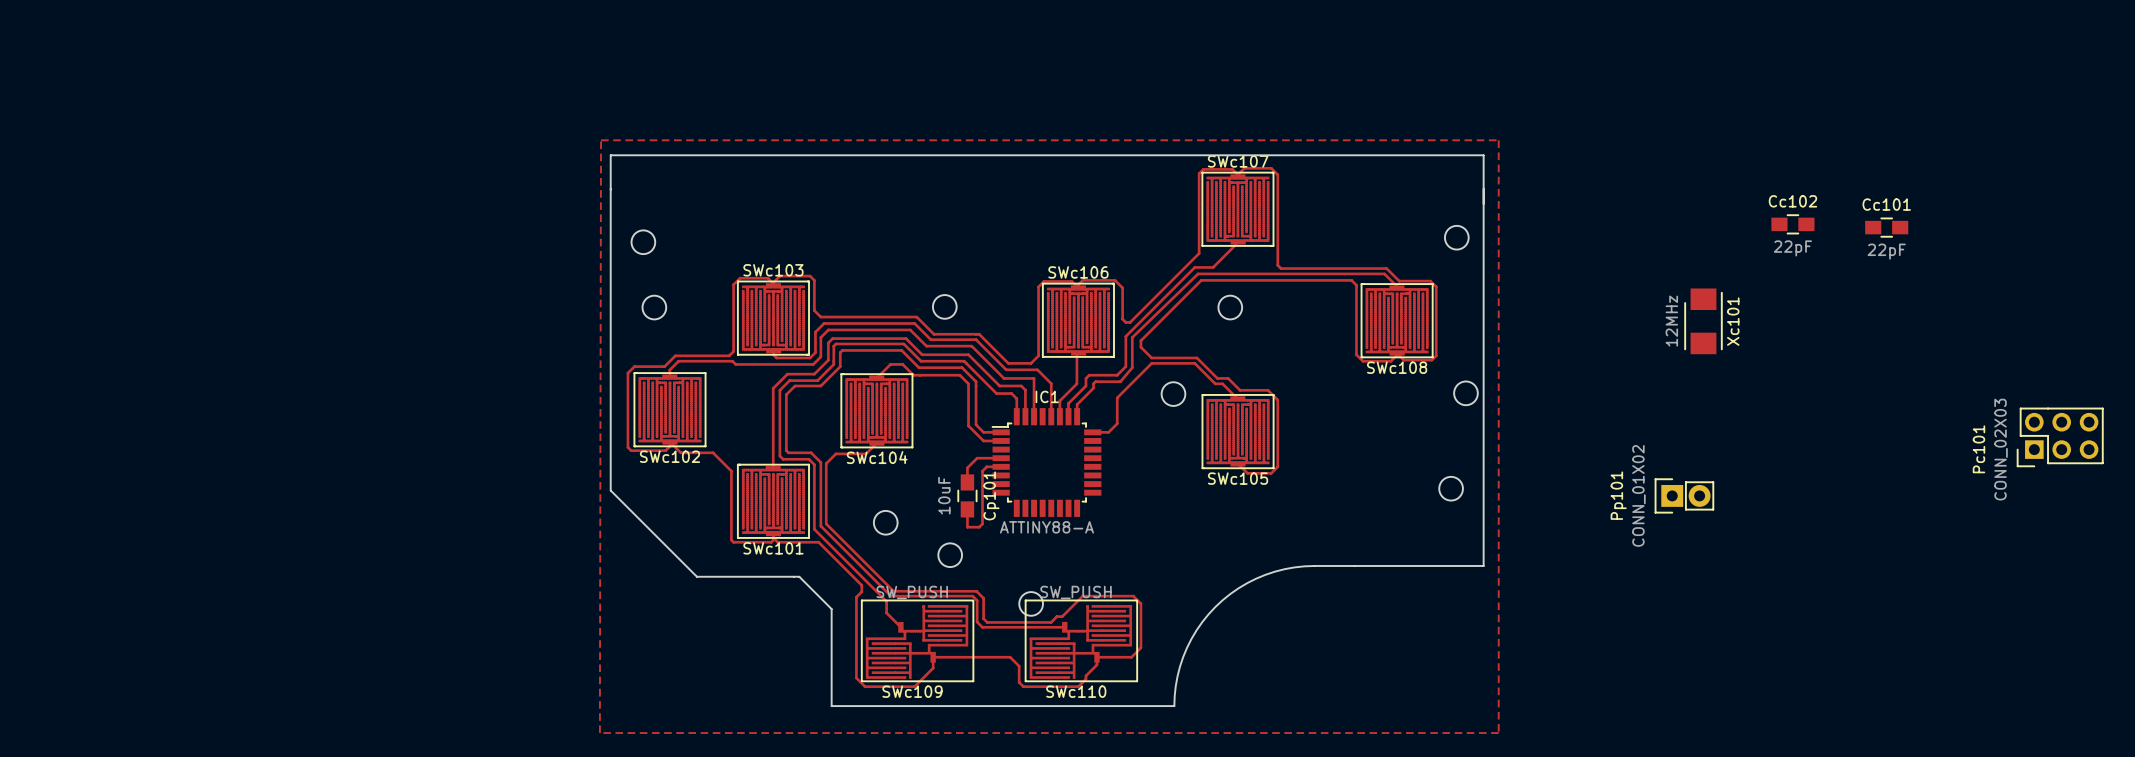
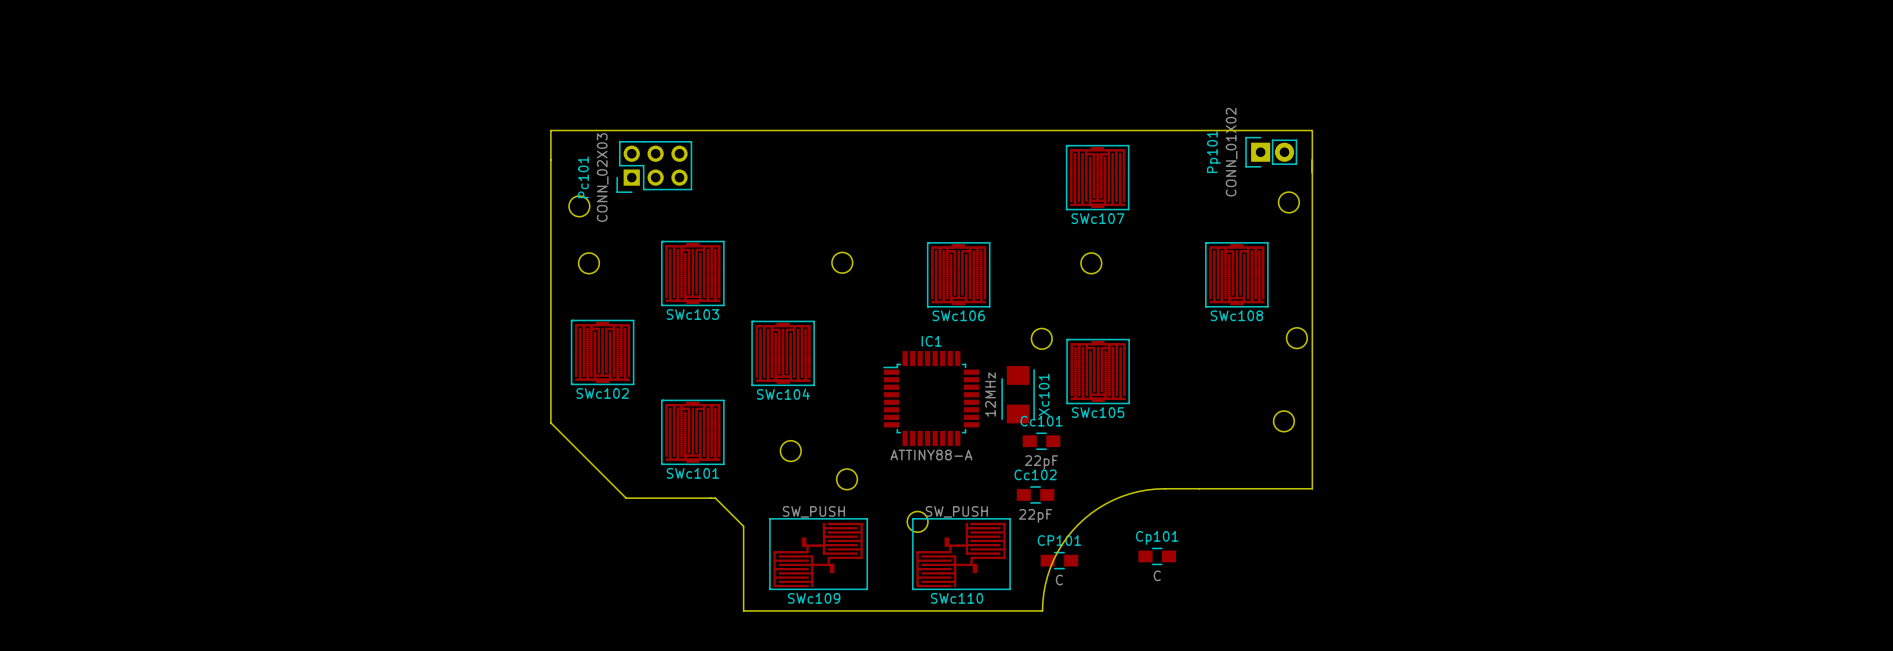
zone outline: (601, 140) (1498, 140) (1498, 733) (599, 733) (601, 140) -> none
track: (1237, 174) (1244, 168) (1271, 168) (1277, 174) (1277, 265) (1281, 268) (1386, 268) (1399, 281) (1430, 281) (1436, 286) (1436, 355) (1431, 360) (1403, 360) (1397, 353) -> none
track: (1237, 174) (1232, 169) (1203, 169) (1199, 173) (1199, 253) (1130, 322) (1125, 322) (1122, 319) (1122, 287) (1115, 280) (1082, 280) (1078, 284) (1078, 288) (1071, 281) (1043, 281) (1038, 286) (1038, 355) (1031, 363) (1008, 363) (979, 334) (934, 334) (916, 317) (820, 317) (814, 310) (814, 280) (810, 276) (779, 276) (773, 282) (773, 285) -> none
SWc107 rotation: 0° (1237, 209) -> 180° (1097, 177)
Cc102 position: (1792, 224) -> (1035, 494)
Cc101 position: (1886, 227) -> (1041, 441)
track: (1238, 241) (1213, 267) (1194, 267) (1125, 336) (1125, 366) (1117, 375) (1089, 375) (1085, 378) (1085, 386) (1068, 403) (1068, 416) -> none
track: (773, 283) (768, 278) (740, 278) (733, 284) (733, 351) (729, 355) (675, 355) (664, 366) (634, 366) (627, 373) (627, 447) (631, 450) (665, 450) (669, 446) (669, 441) (680, 452) (713, 452) (731, 471) (731, 540) (733, 542) (771, 542) (773, 540) (773, 533) -> none
track: (1396, 288) (1384, 273) (1198, 273) (1132, 337) (1132, 367) (1120, 381) (1095, 381) (1093, 388) (1077, 404) (1077, 416) -> none
SWc103 rotation: 0° (773, 318) -> 180° (692, 273)
SWc106 rotation: 0° (1078, 320) -> 180° (958, 274)
Xc101 position: (1703, 321) -> (1018, 394)
track: (773, 350) (773, 354) (776, 357) (810, 357) (815, 352) (815, 332) (824, 323) (914, 323) (930, 339) (976, 339) (1006, 369) (1037, 369) (1051, 383) (1051, 416) -> none
track: (1078, 352) (1076, 354) (1076, 383) (1059, 400) (1059, 416) -> none
track: (1397, 352) (1390, 361) (1362, 361) (1356, 354) (1356, 285) (1351, 280) (1201, 280) (1140, 340) (1140, 347) (1151, 357) (1196, 357) (1217, 378) (1228, 378) (1240, 390) (1268, 390) (1277, 400) (1277, 466) (1271, 473) (1247, 473) (1238, 463) -> none
track: (669, 377) (669, 370) (678, 361) (732, 361) (735, 364) (813, 364) (820, 356) (820, 337) (828, 329) (910, 329) (926, 346) (971, 346) (1004, 378) (1033, 378) (1034, 416) -> none
track: (876, 378) (890, 364) (902, 364) (913, 375) (959, 375) (968, 383) (968, 425) (983, 440) (1001, 440) -> none
track: (1237, 399) (1222, 383) (1215, 383) (1194, 363) (1151, 363) (1117, 397) (1117, 423) (1108, 432) (1092, 432) -> none
track: (1016, 416) (1016, 398) (1011, 393) (996, 393) (964, 361) (921, 361) (903, 343) (835, 343) (833, 346) (833, 364) (817, 380) (789, 380) (779, 390) (779, 456) (783, 459) (809, 459) (814, 464) (814, 529) (886, 601) (886, 612) (900, 627) -> none
track: (1025, 416) (1025, 390) (1021, 386) (999, 386) (968, 354) (922, 354) (906, 338) (832, 338) (828, 342) (828, 360) (814, 374) (787, 374) (773, 388) (773, 468) -> none
track: (1001, 432) (983, 432) (976, 424) (976, 381) (962, 367) (918, 367) (901, 350) (842, 350) (840, 352) (840, 366) (820, 386) (795, 386) (786, 394) (786, 450) (788, 452) (811, 452) (820, 462) (820, 526) (890, 596) (972, 596) (977, 600) (977, 622) (982, 627) (1064, 627) -> none
Pc101 position: (2060, 437) -> (654, 166)
track: (876, 443) (866, 453) (835, 453) (826, 463) (826, 523) (893, 591) (976, 591) (983, 598) (983, 618) (987, 622) (1051, 622) (1056, 616) (1062, 616) (1082, 596) (1133, 596) (1140, 603) (1140, 647) (1131, 657) (1096, 657) (1096, 664) (1078, 686) (1023, 686) (1019, 682) (1019, 666) (1010, 657) (933, 657) (933, 668) (914, 686) (865, 686) (856, 678) (856, 597) (861, 591) (861, 585) (818, 542) (777, 542) (773, 537) -> none
track: (1001, 458) (977, 458) (967, 467) (967, 482) -> none
track: (1001, 466) (986, 466) (982, 471) (982, 523) (979, 527) (967, 527) (967, 509) -> none
Cp101 value: 10uF (944, 495) -> C (1157, 575)
Cp101 rotation: 0° (967, 495) -> 90° clockwise (1157, 556)
Cp101 position: (967, 495) -> (1157, 556)
Cp101 name position: Cp101 (991, 495) -> Cp101 (1157, 537)
Pp101 position: (1684, 495) -> (1271, 152)
CP101: none -> C (1059, 560)

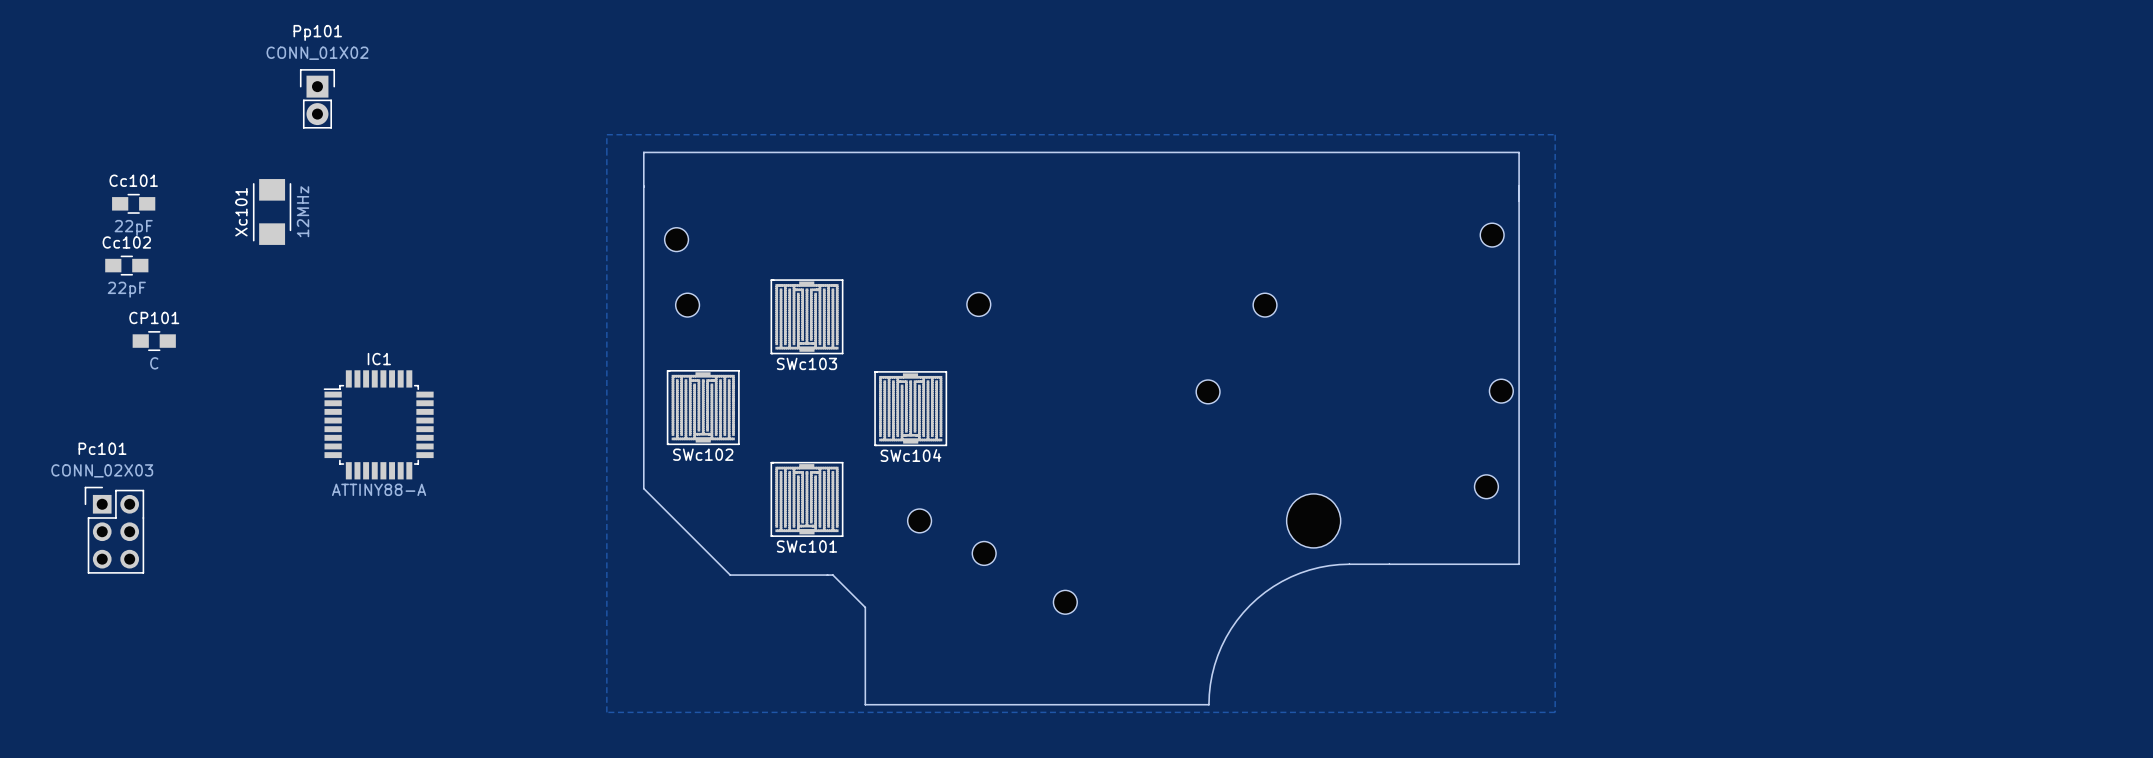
zone outline: none -> (606, 134) (1555, 134) (1555, 712) (606, 712) (606, 134)
Pp101 rotation: 0° (1271, 152) -> 90° clockwise (317, 98)
Pp101 position: (1271, 152) -> (317, 98)
Pc101 rotation: 0° (654, 166) -> 90° clockwise (114, 530)
Pc101 position: (654, 166) -> (114, 530)
SWc107: (1097, 177) -> none
SWc106: (958, 274) -> none
SWc108: (1236, 274) -> none
SWc105: (1098, 371) -> none
Xc101 rotation: 0° (1018, 394) -> 180° (272, 211)
Xc101 position: (1018, 394) -> (272, 211)
IC1 position: (931, 398) -> (378, 424)
Cc101 position: (1041, 441) -> (133, 203)
part: none -> (1313, 520)
Cc102 position: (1035, 494) -> (126, 265)
SWc109: SW_PUSH (818, 554) -> none
SWc110: SW_PUSH (961, 554) -> none
Cp101: C (1157, 556) -> none
CP101 position: (1059, 560) -> (154, 341)

